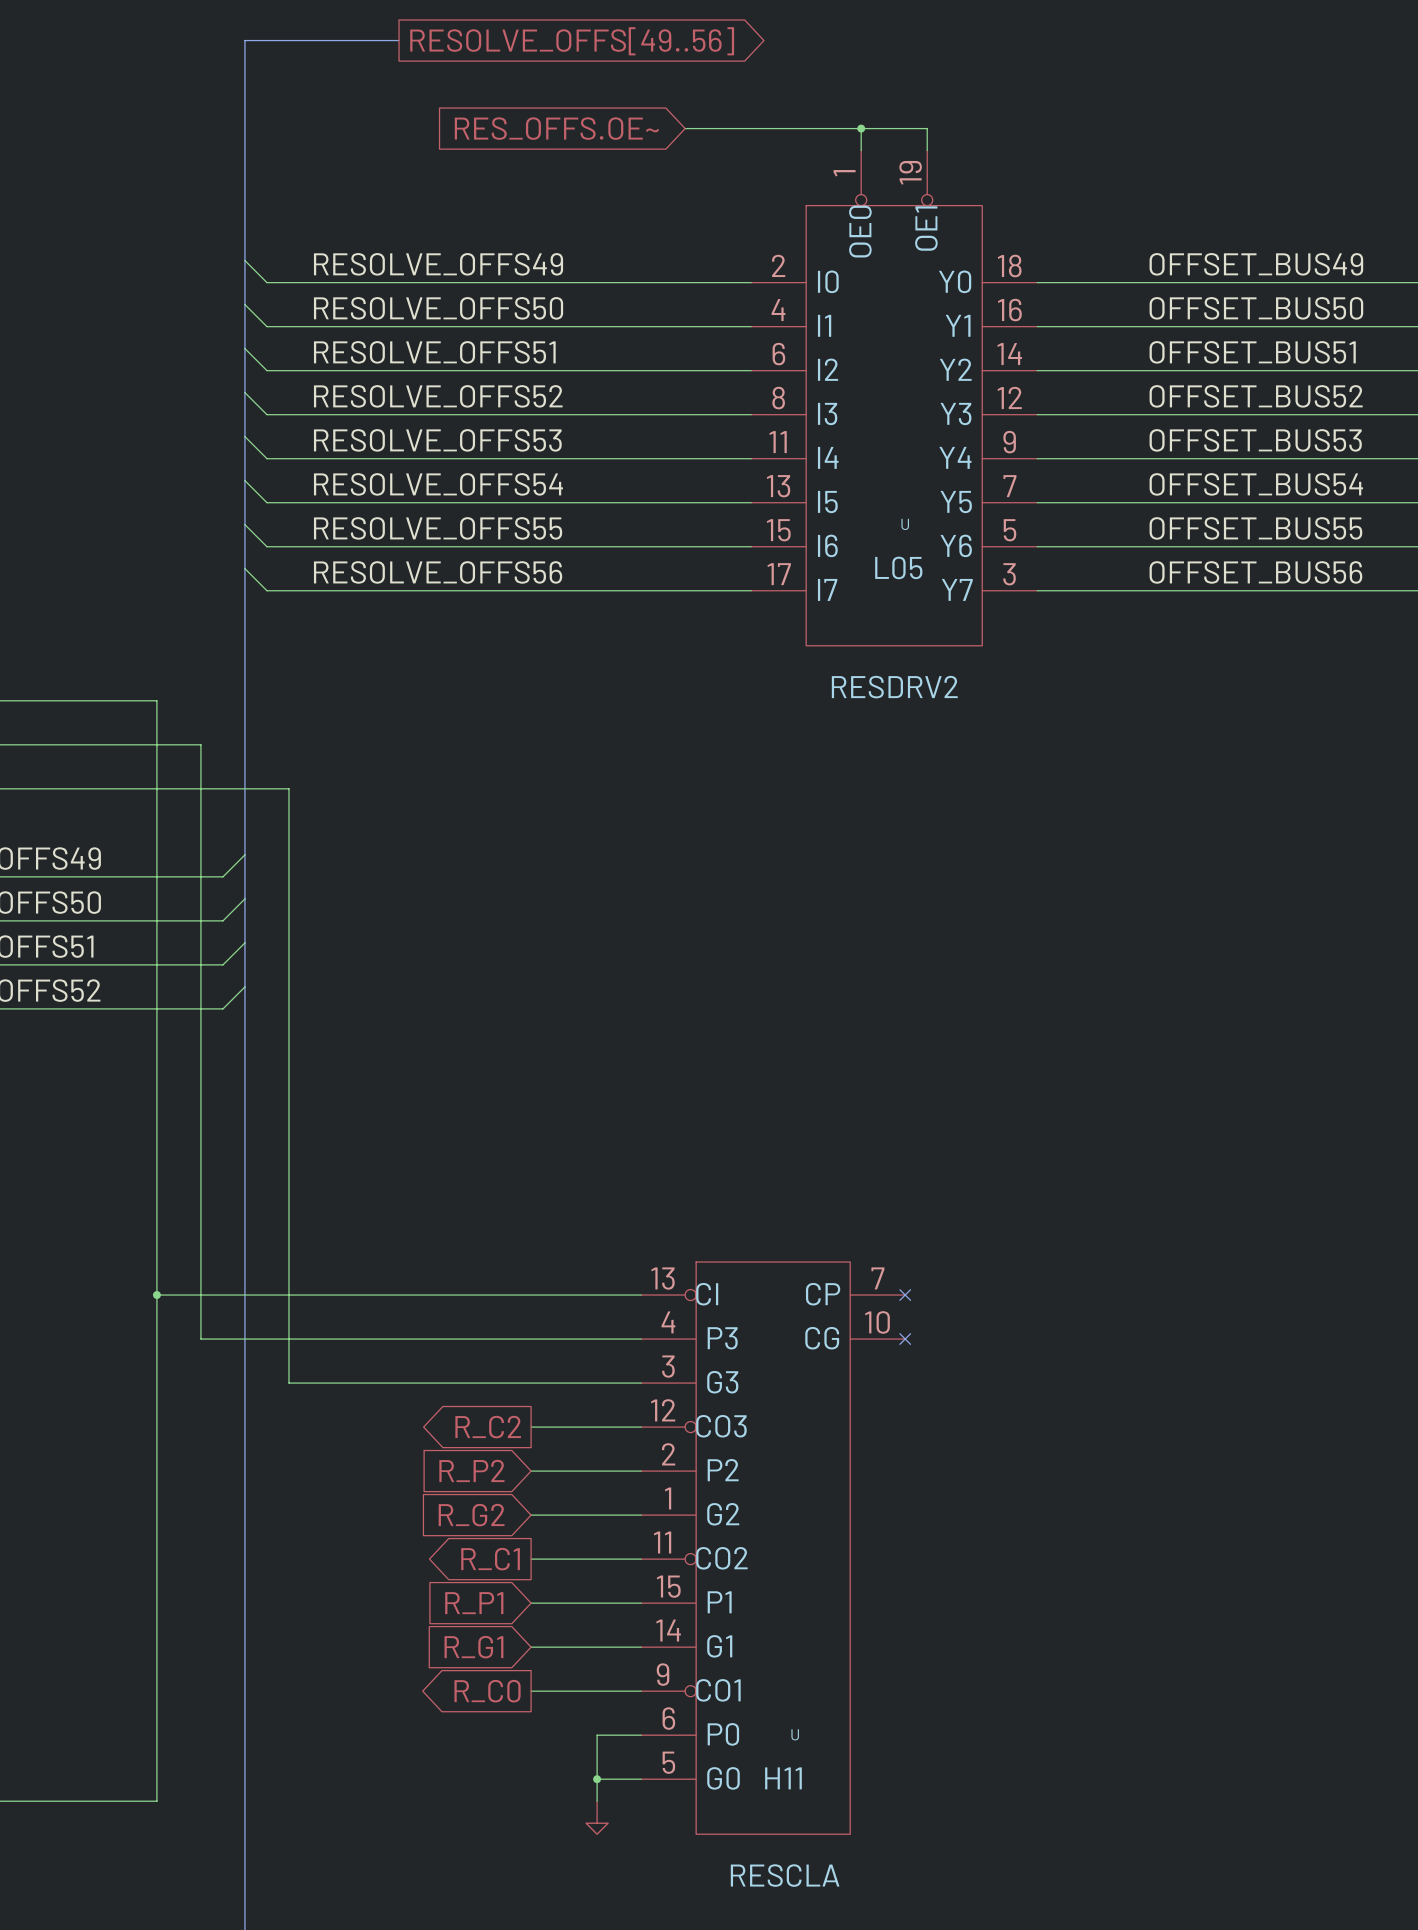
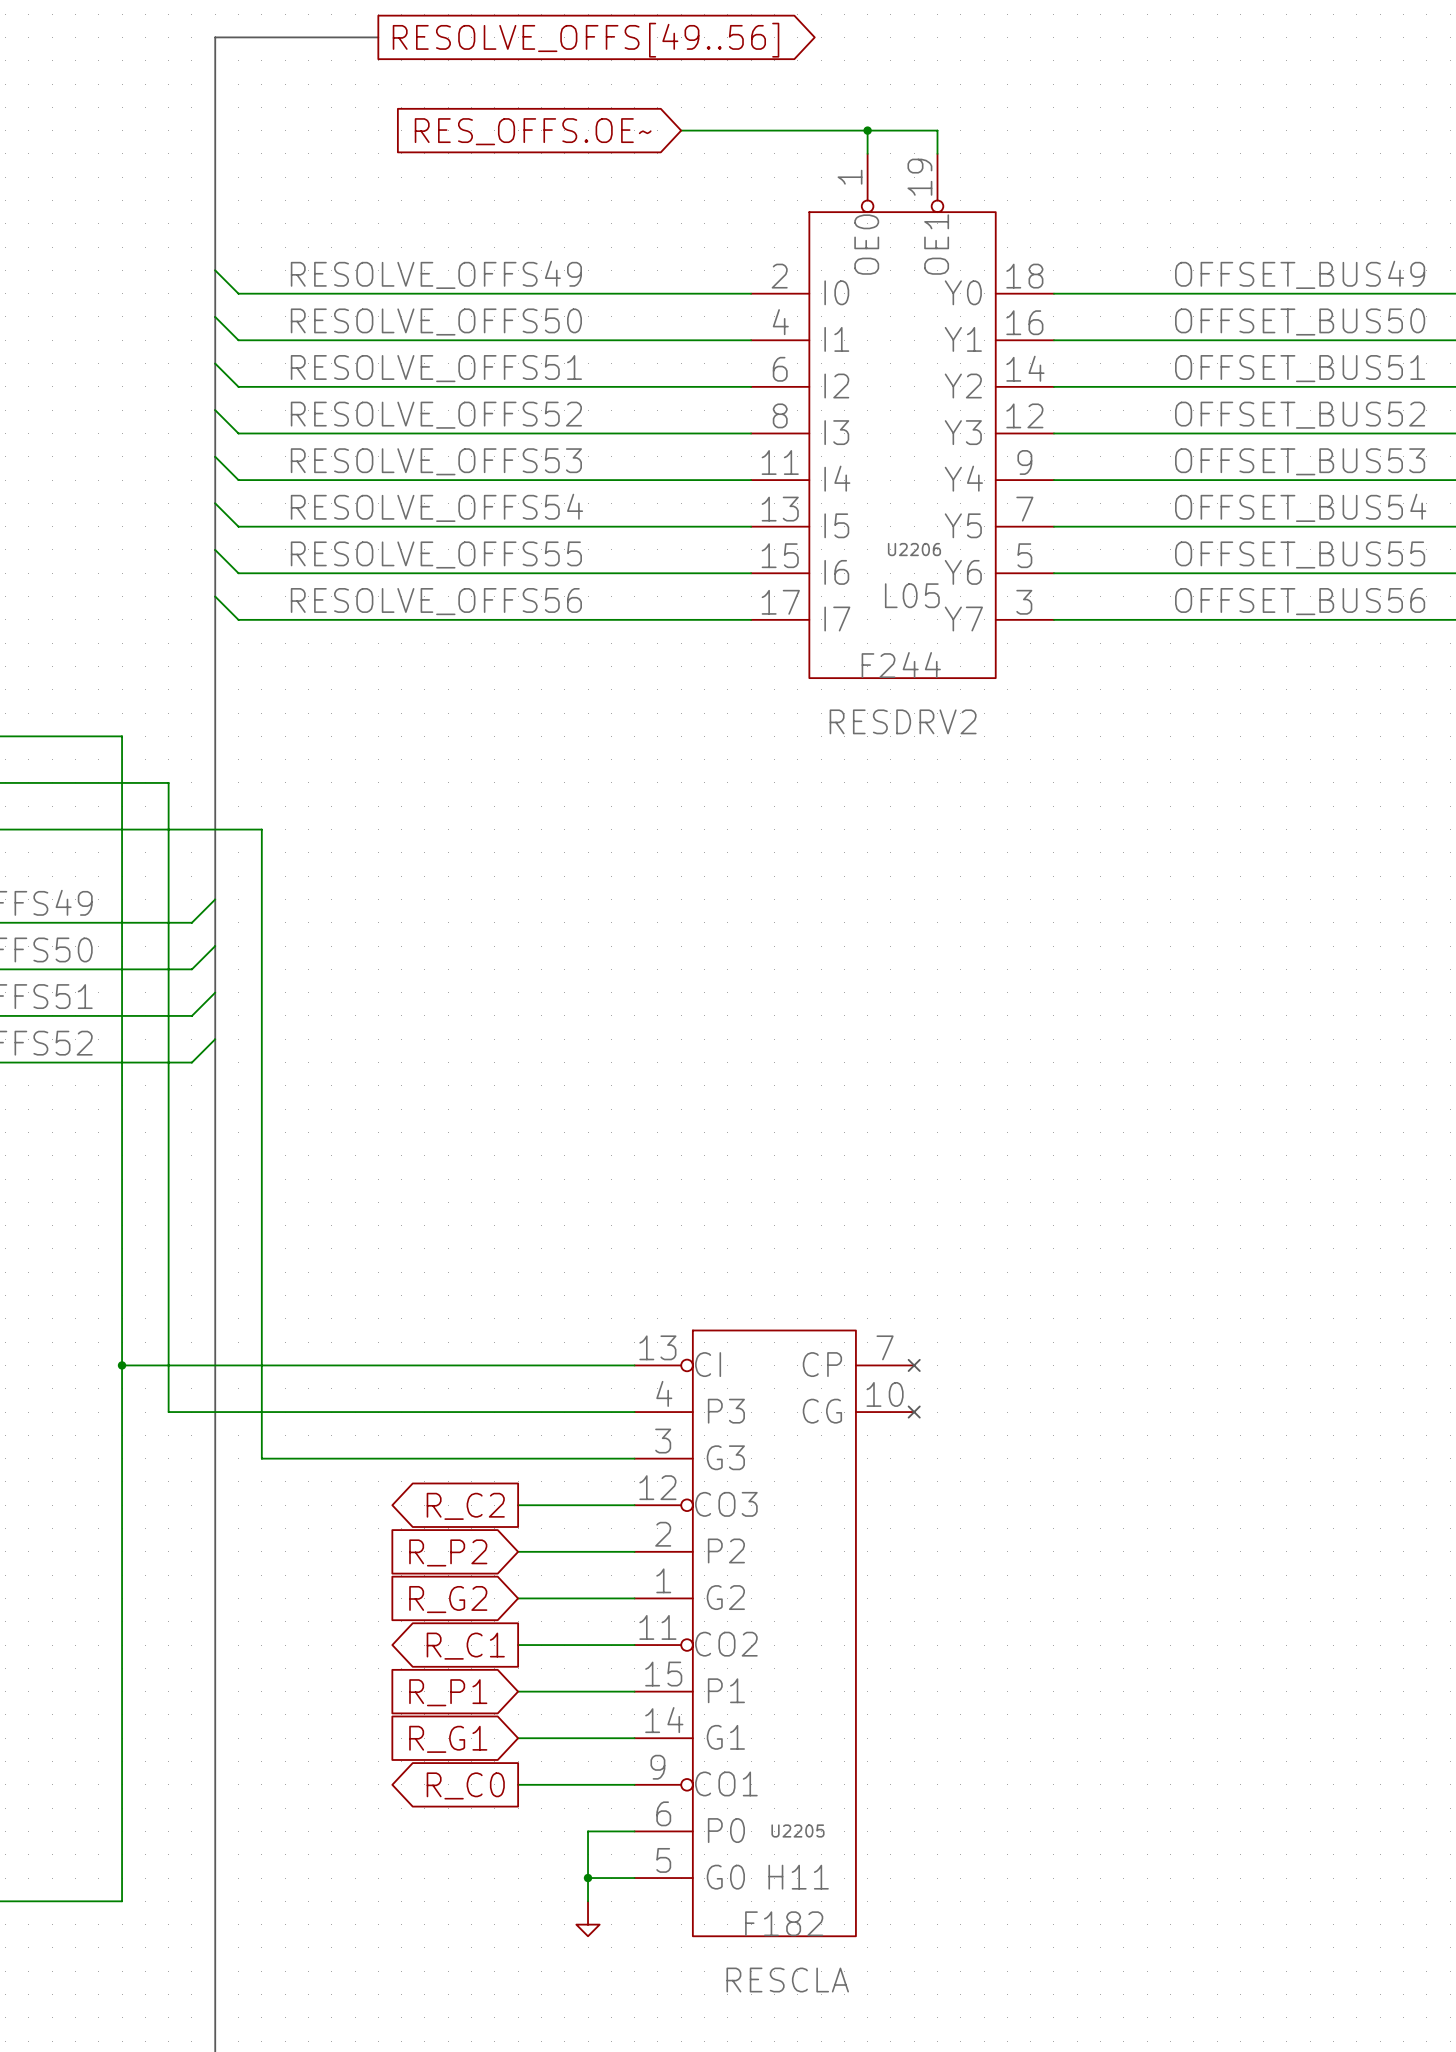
U name: U (905, 524) -> U2206 (914, 549)
U value: none -> F244 (901, 665)
U name: U (795, 1734) -> U2205 (797, 1830)
U value: none -> F182 (784, 1923)

